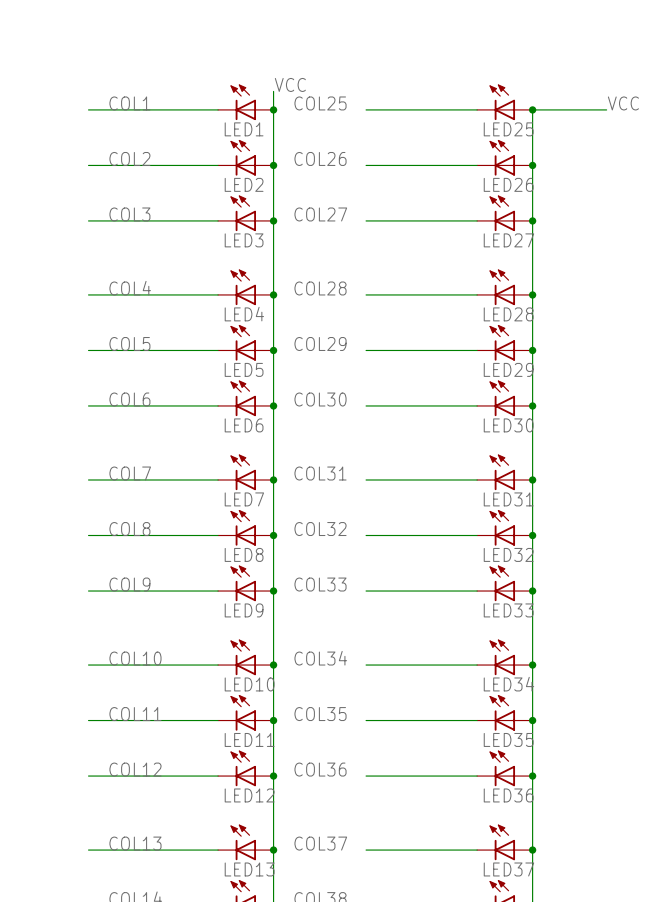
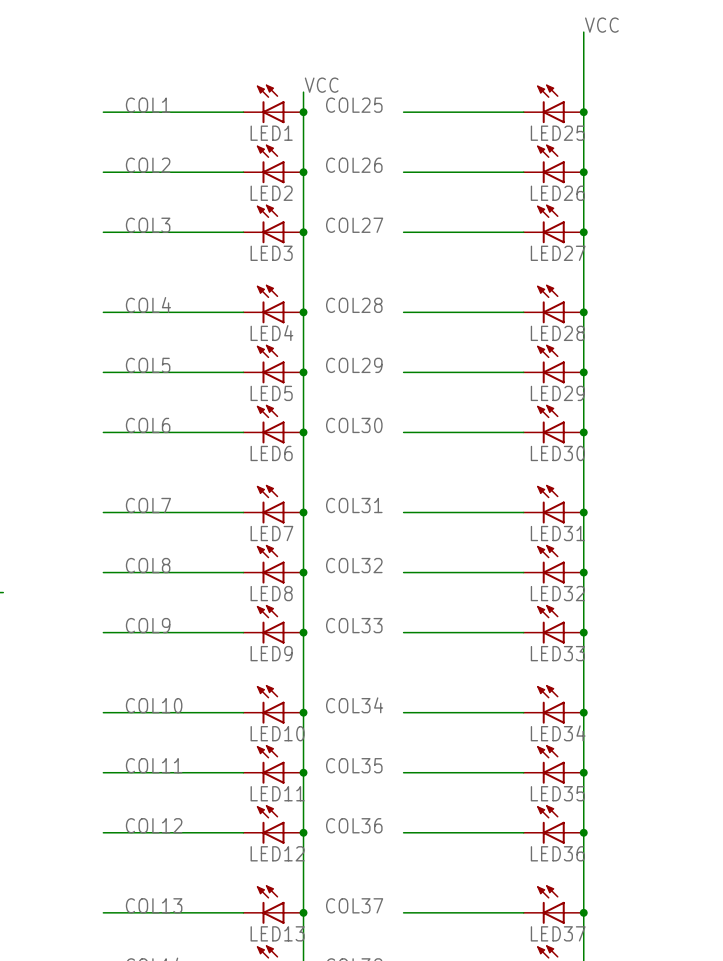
label position: VCC (623, 103) -> VCC (601, 25)
wire: (532, 109) (606, 109) -> (583, 112) (583, 32)

